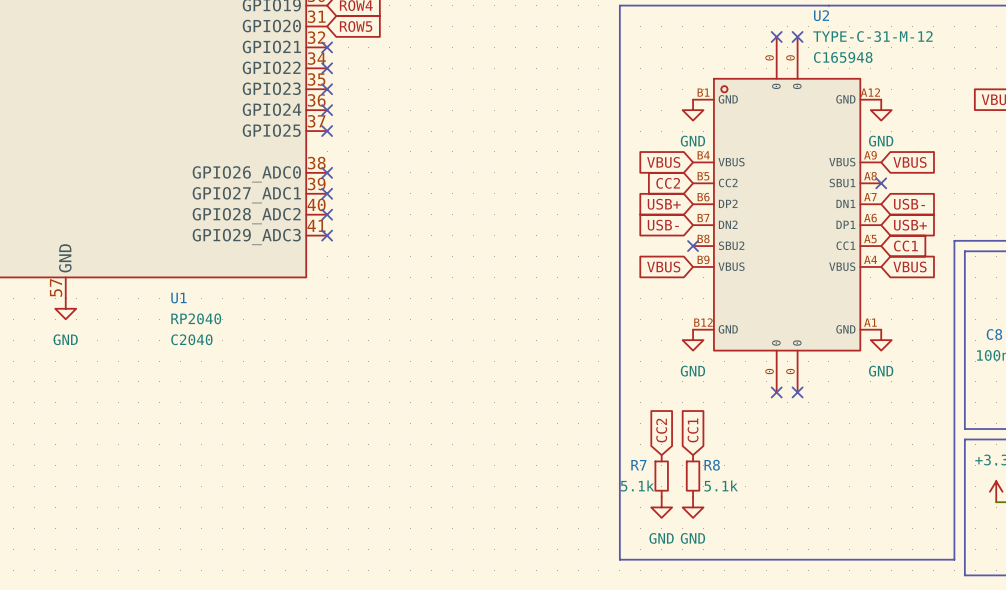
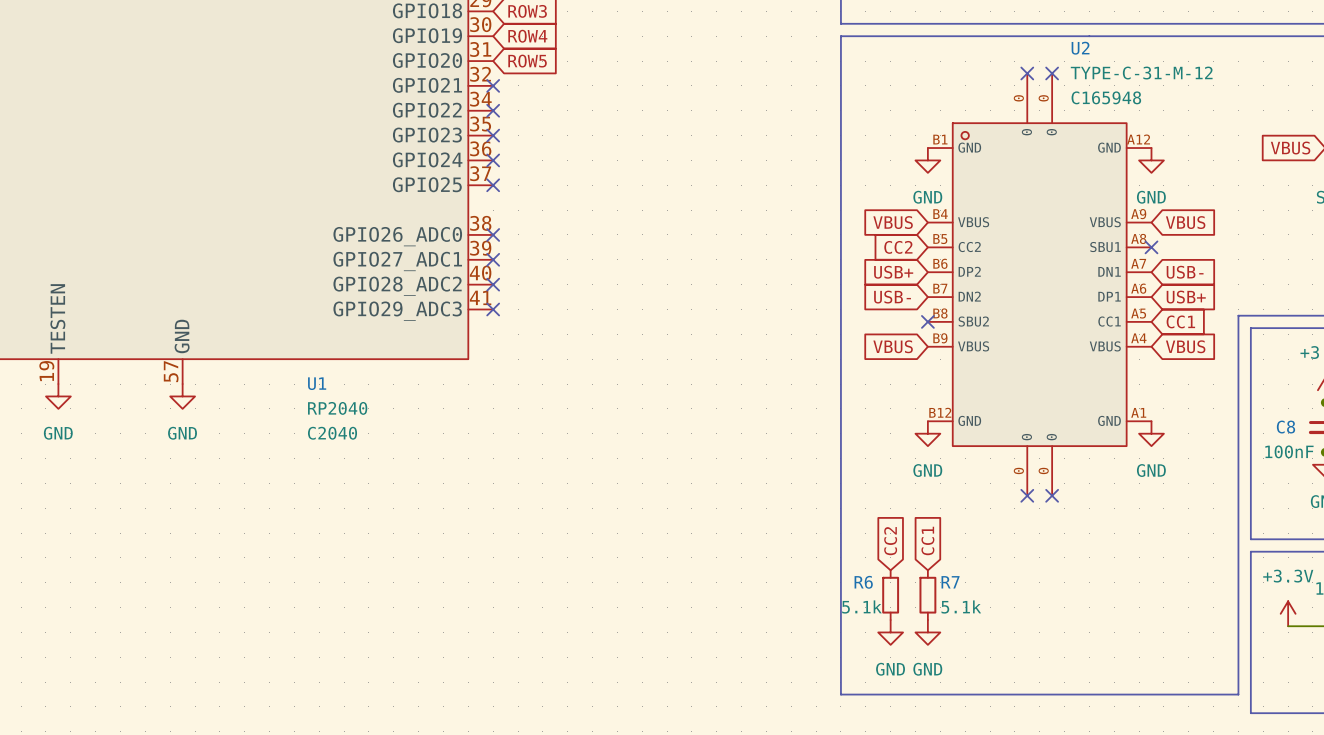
R7 name: R7 (638, 465) -> R6 (863, 582)
R8 name: R8 (712, 465) -> R7 (950, 582)

